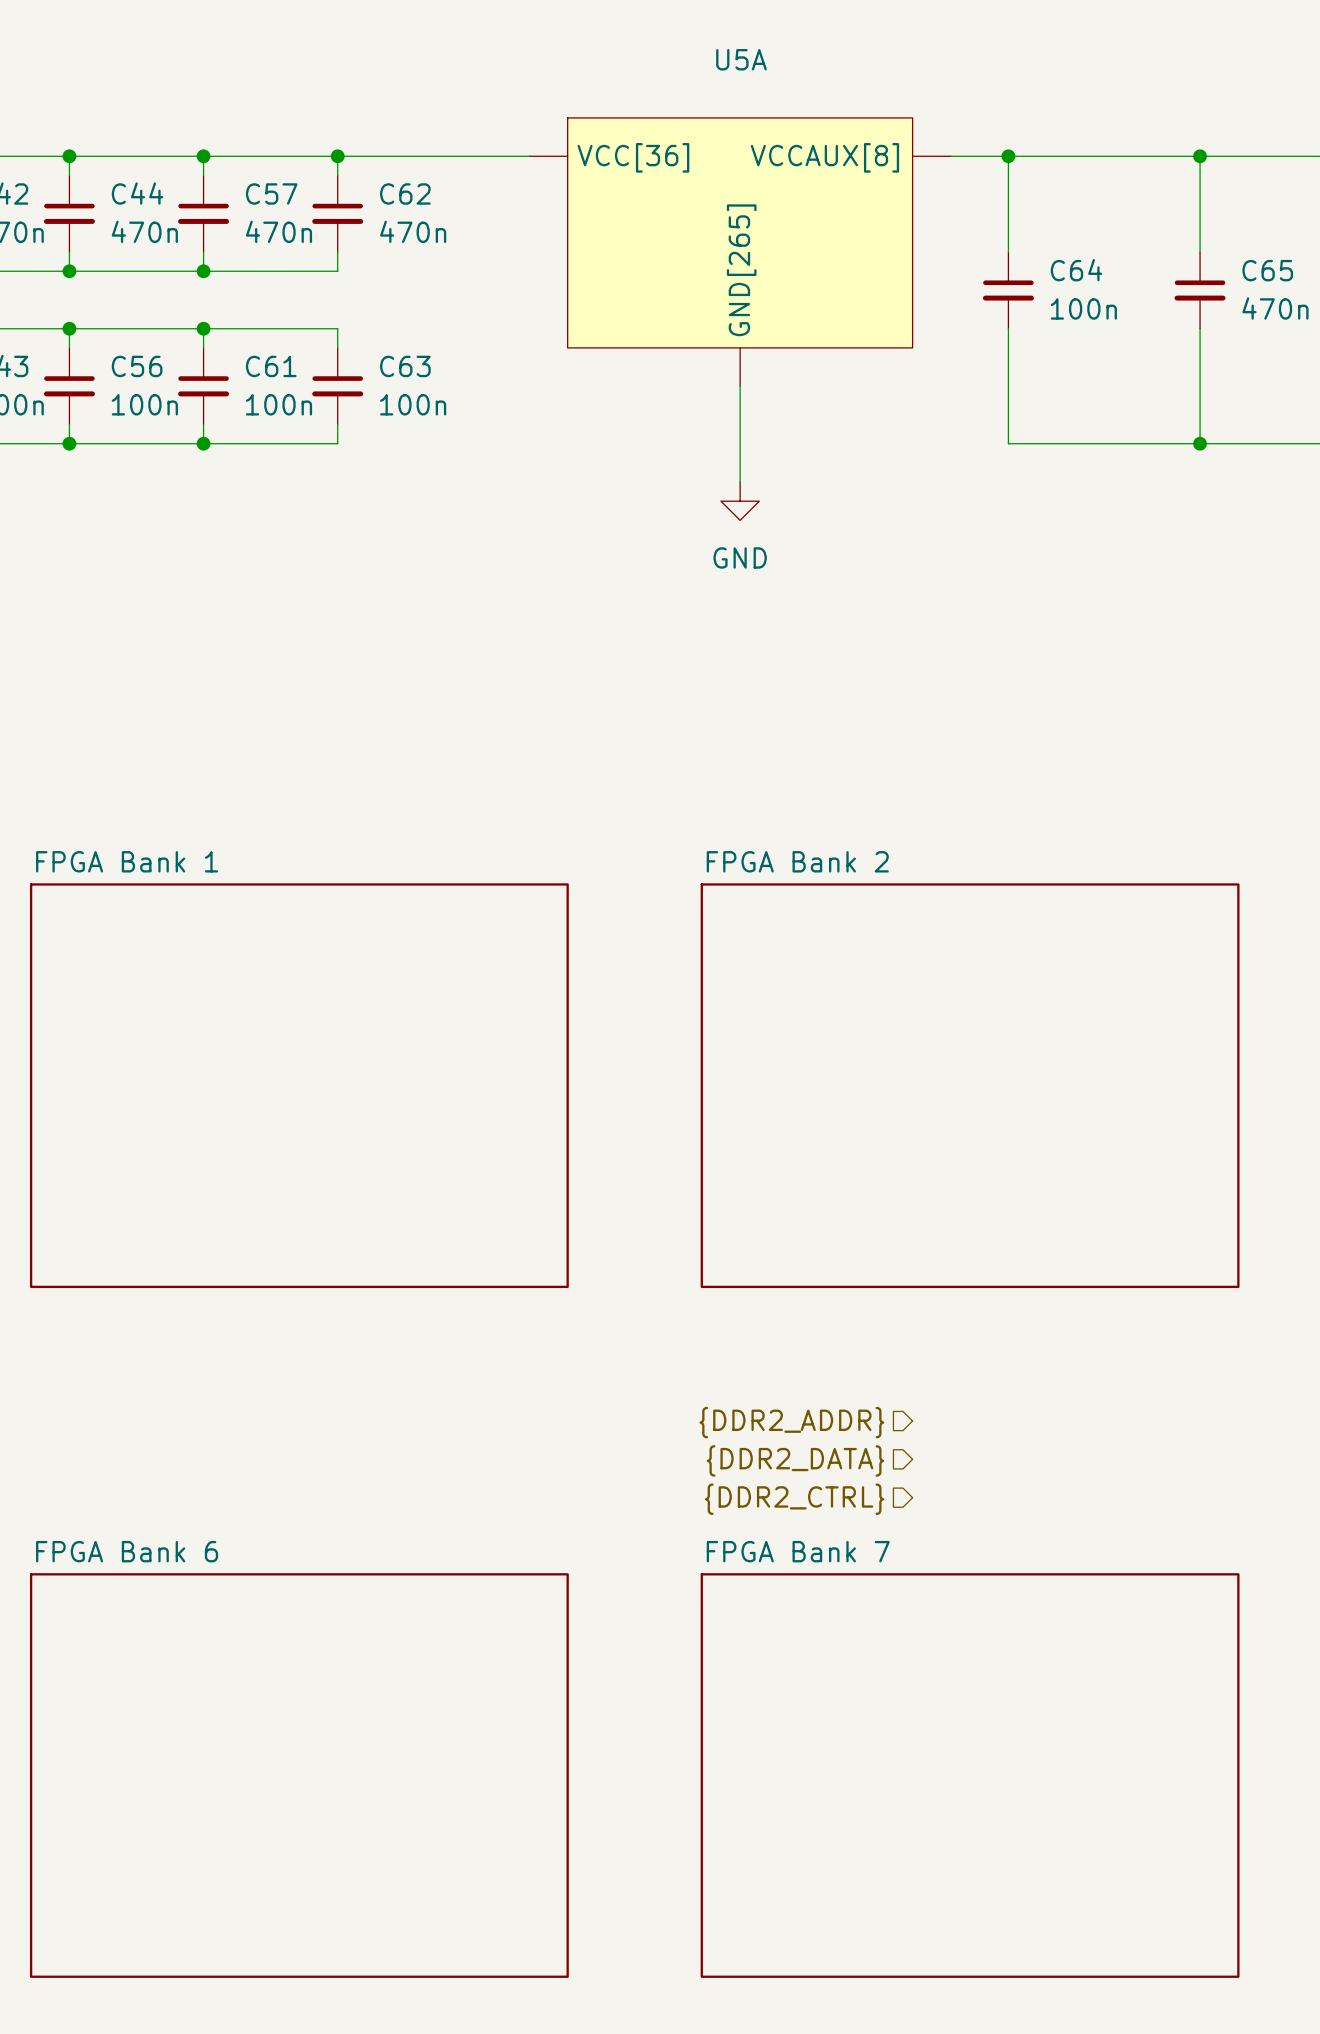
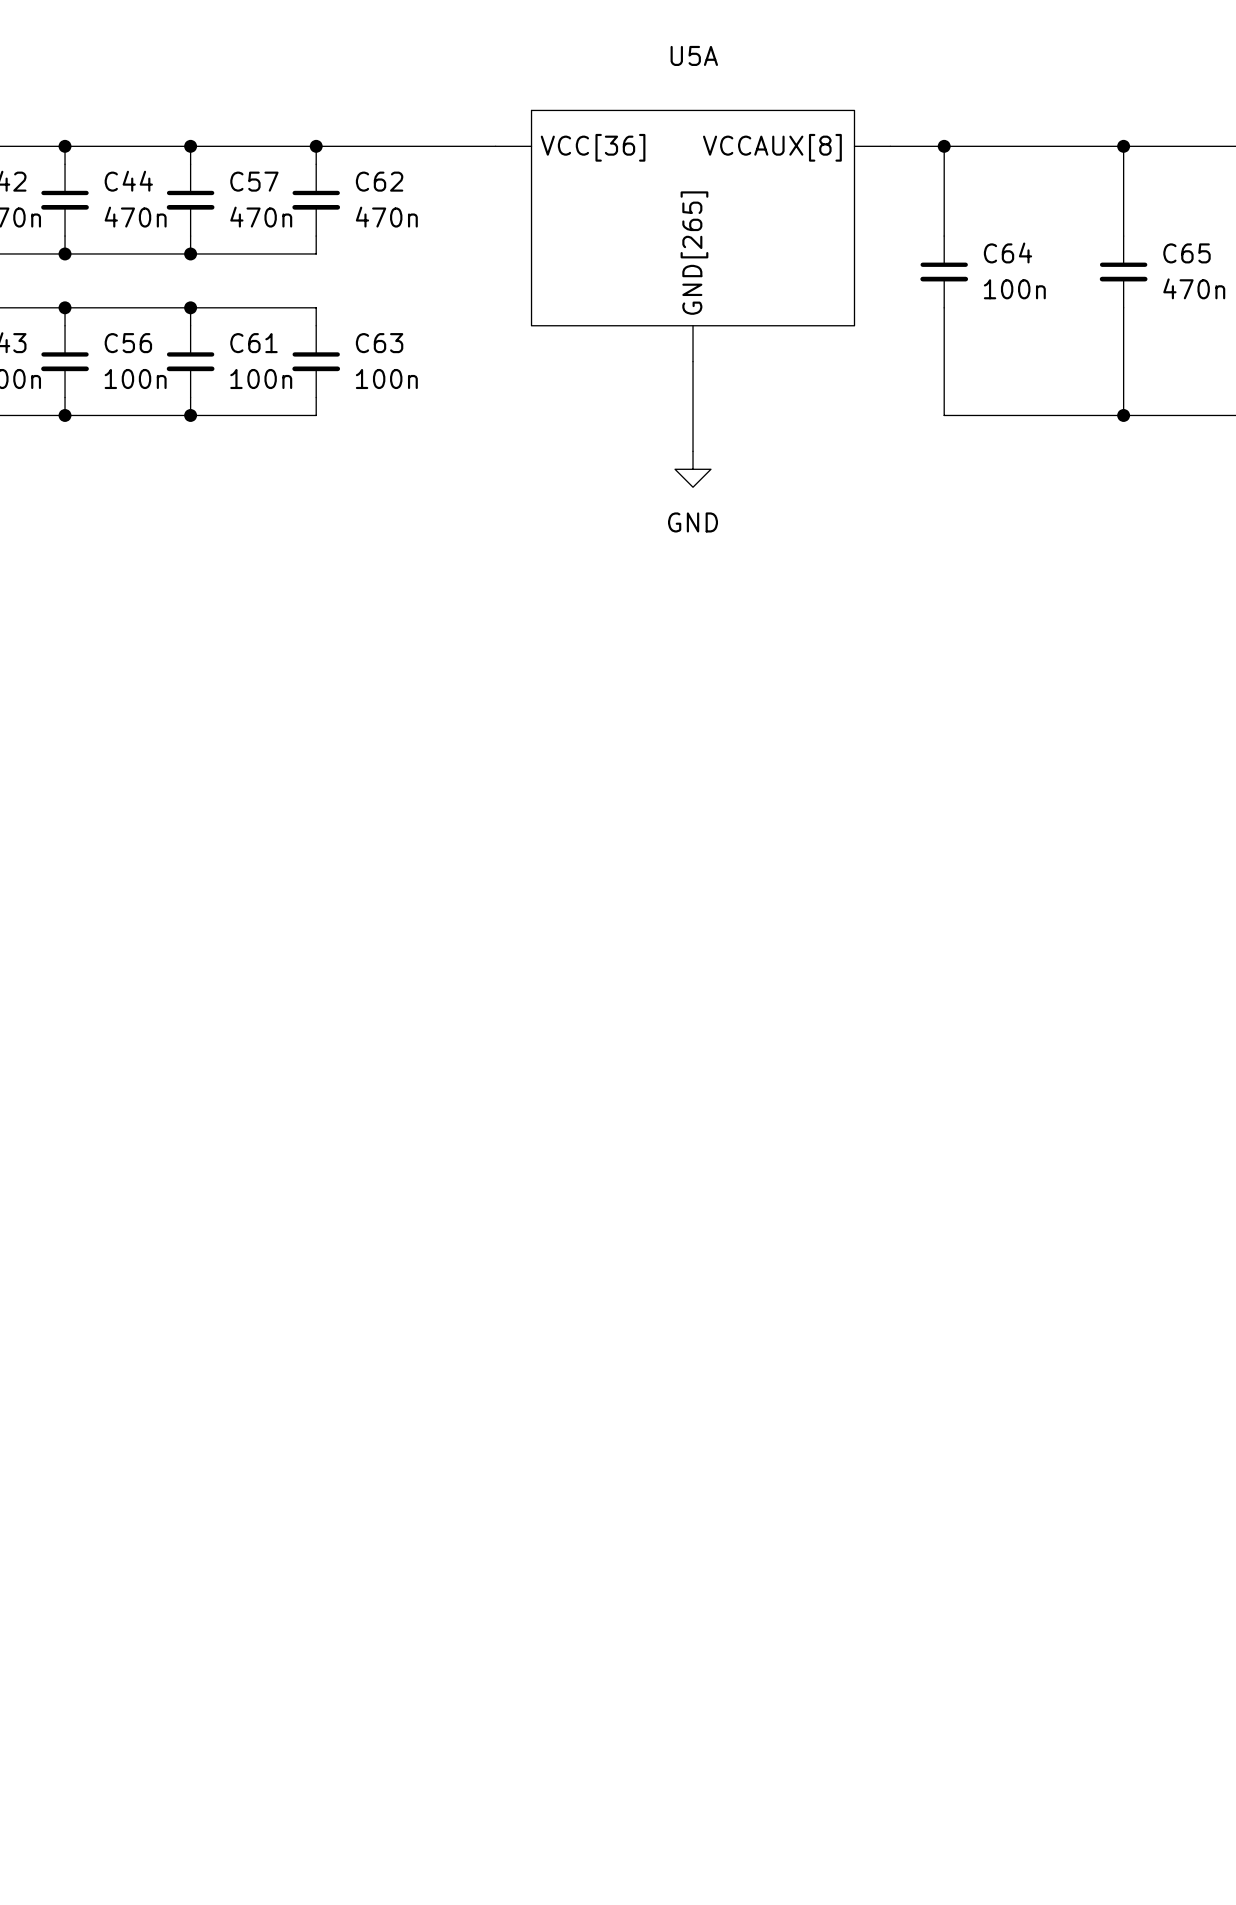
sheet FPGA Bank 1: (299, 1085) -> none
sheet FPGA Bank 2: (970, 1085) -> none
hierarchical label: {DDR2_ADDR} (791, 1422) -> none
hierarchical label: {DDR2_DATA} (795, 1460) -> none
hierarchical label: {DDR2_CTRL} (794, 1499) -> none
sheet FPGA Bank 6: (299, 1775) -> none
sheet FPGA Bank 7: (970, 1775) -> none

